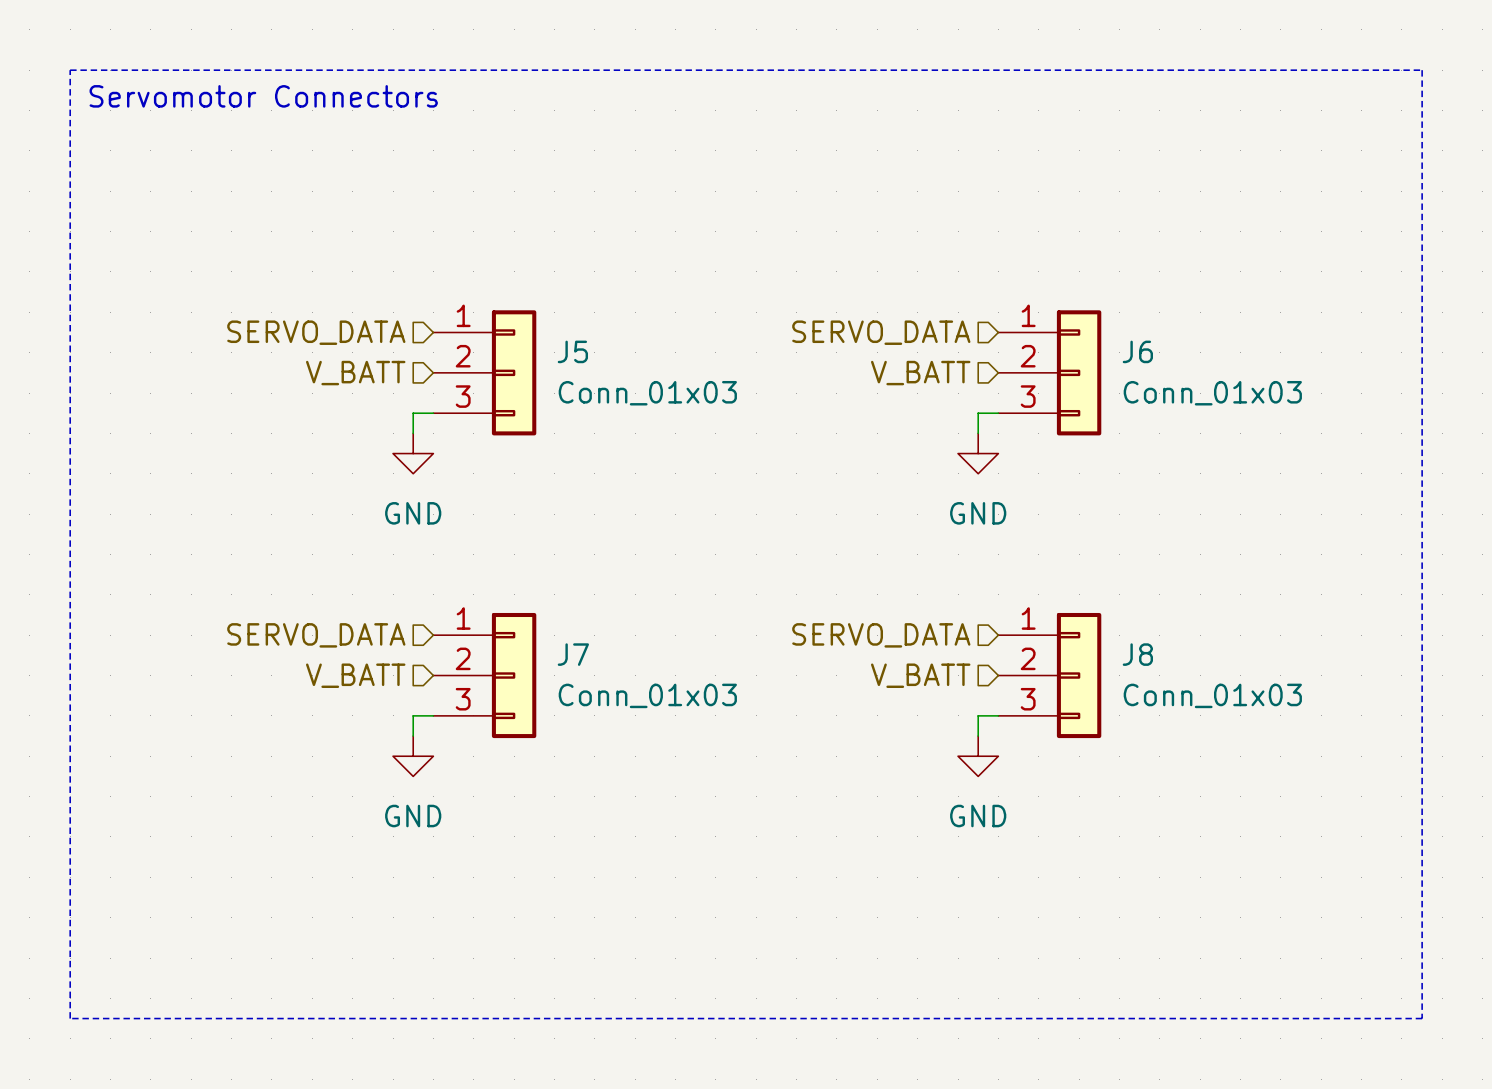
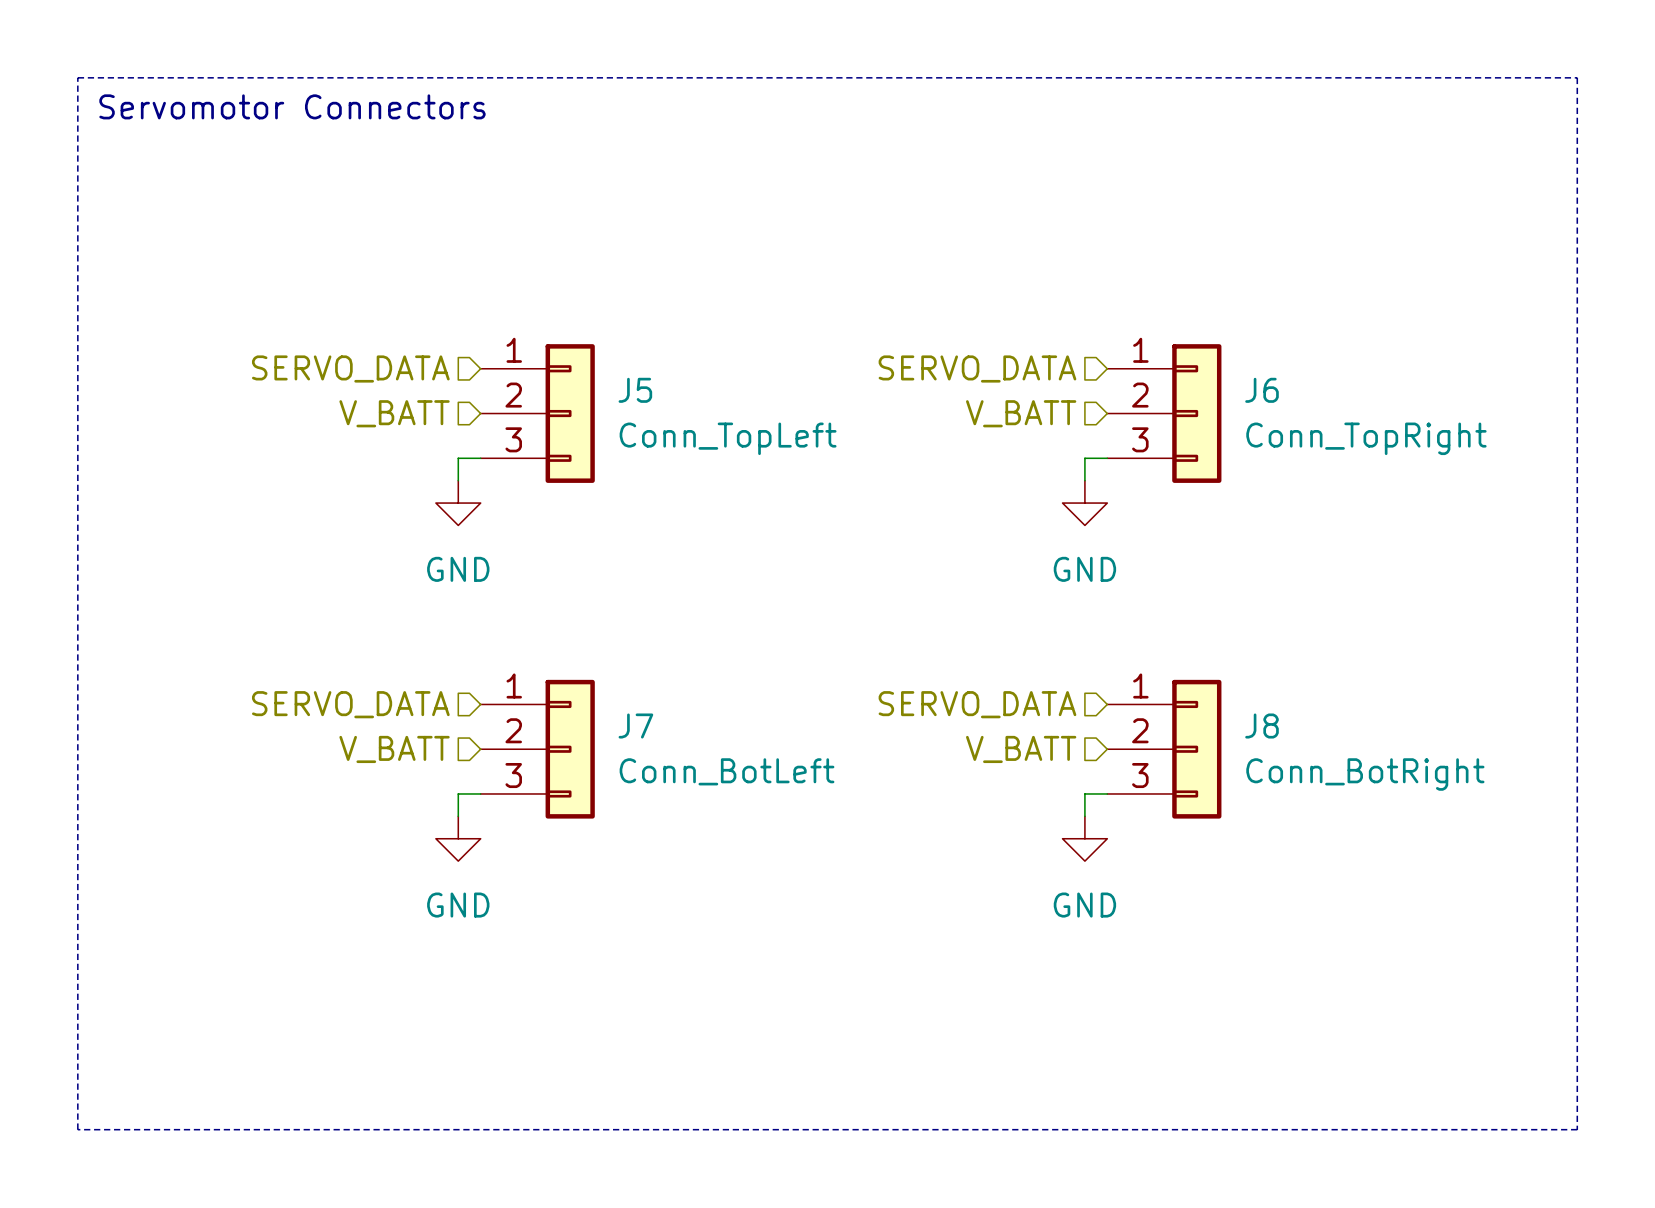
J5 value: Conn_01x03 (647, 393) -> Conn_TopLeft (728, 438)
J6 value: Conn_01x03 (1212, 393) -> Conn_TopRight (1366, 438)
J7 value: Conn_01x03 (647, 695) -> Conn_BotLeft (727, 771)
J8 value: Conn_01x03 (1212, 695) -> Conn_BotRight (1365, 774)

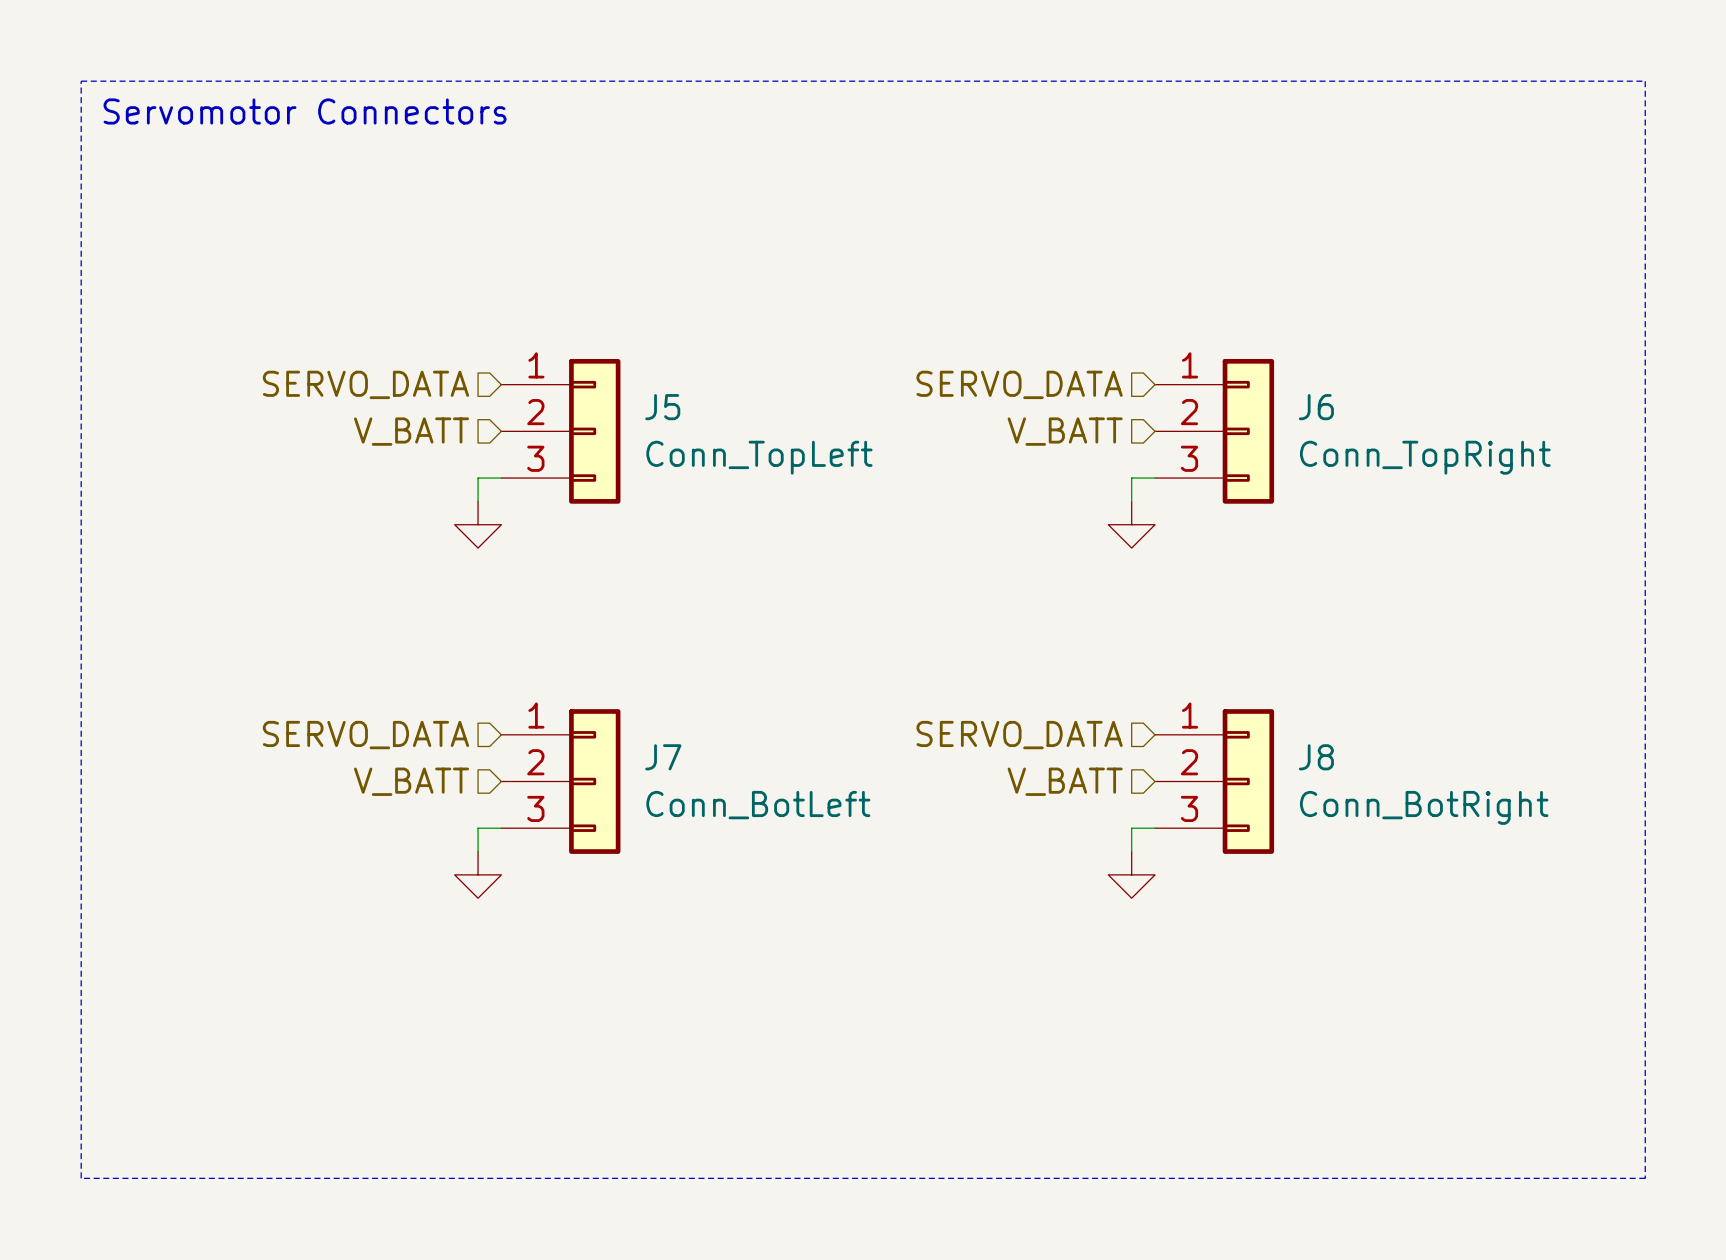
power symbol text: GND (458, 569) -> none
power symbol text: GND (1084, 569) -> none
power symbol text: GND (458, 905) -> none
power symbol text: GND (1084, 905) -> none

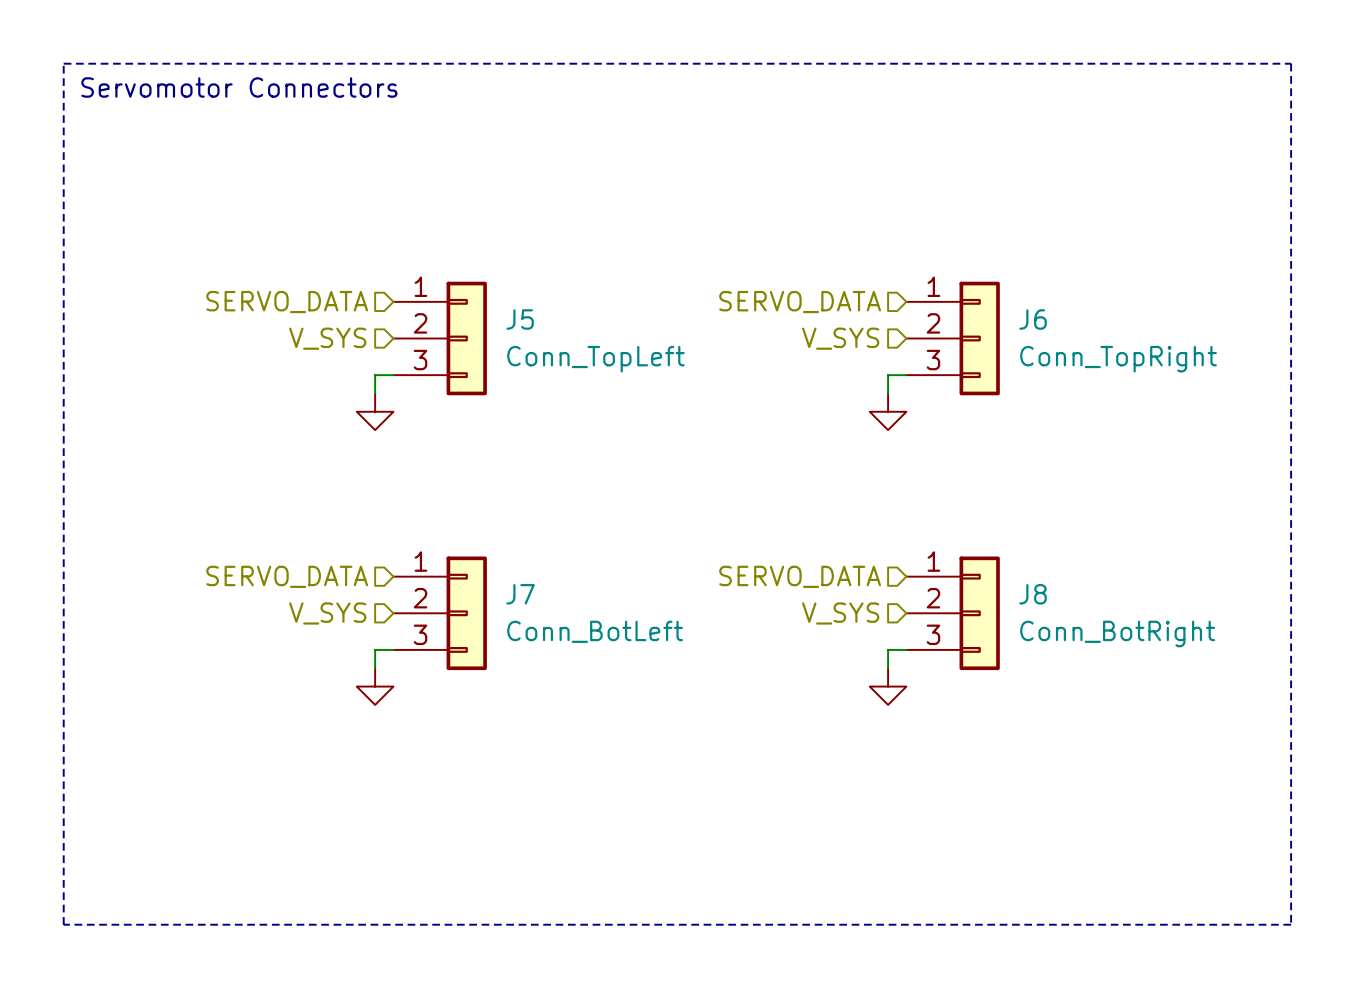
hierarchical label: V_BATT (411, 431) -> V_SYS (327, 338)
hierarchical label: V_BATT (1065, 431) -> V_SYS (840, 338)
hierarchical label: V_BATT (411, 781) -> V_SYS (327, 613)
hierarchical label: V_BATT (1065, 781) -> V_SYS (840, 613)

